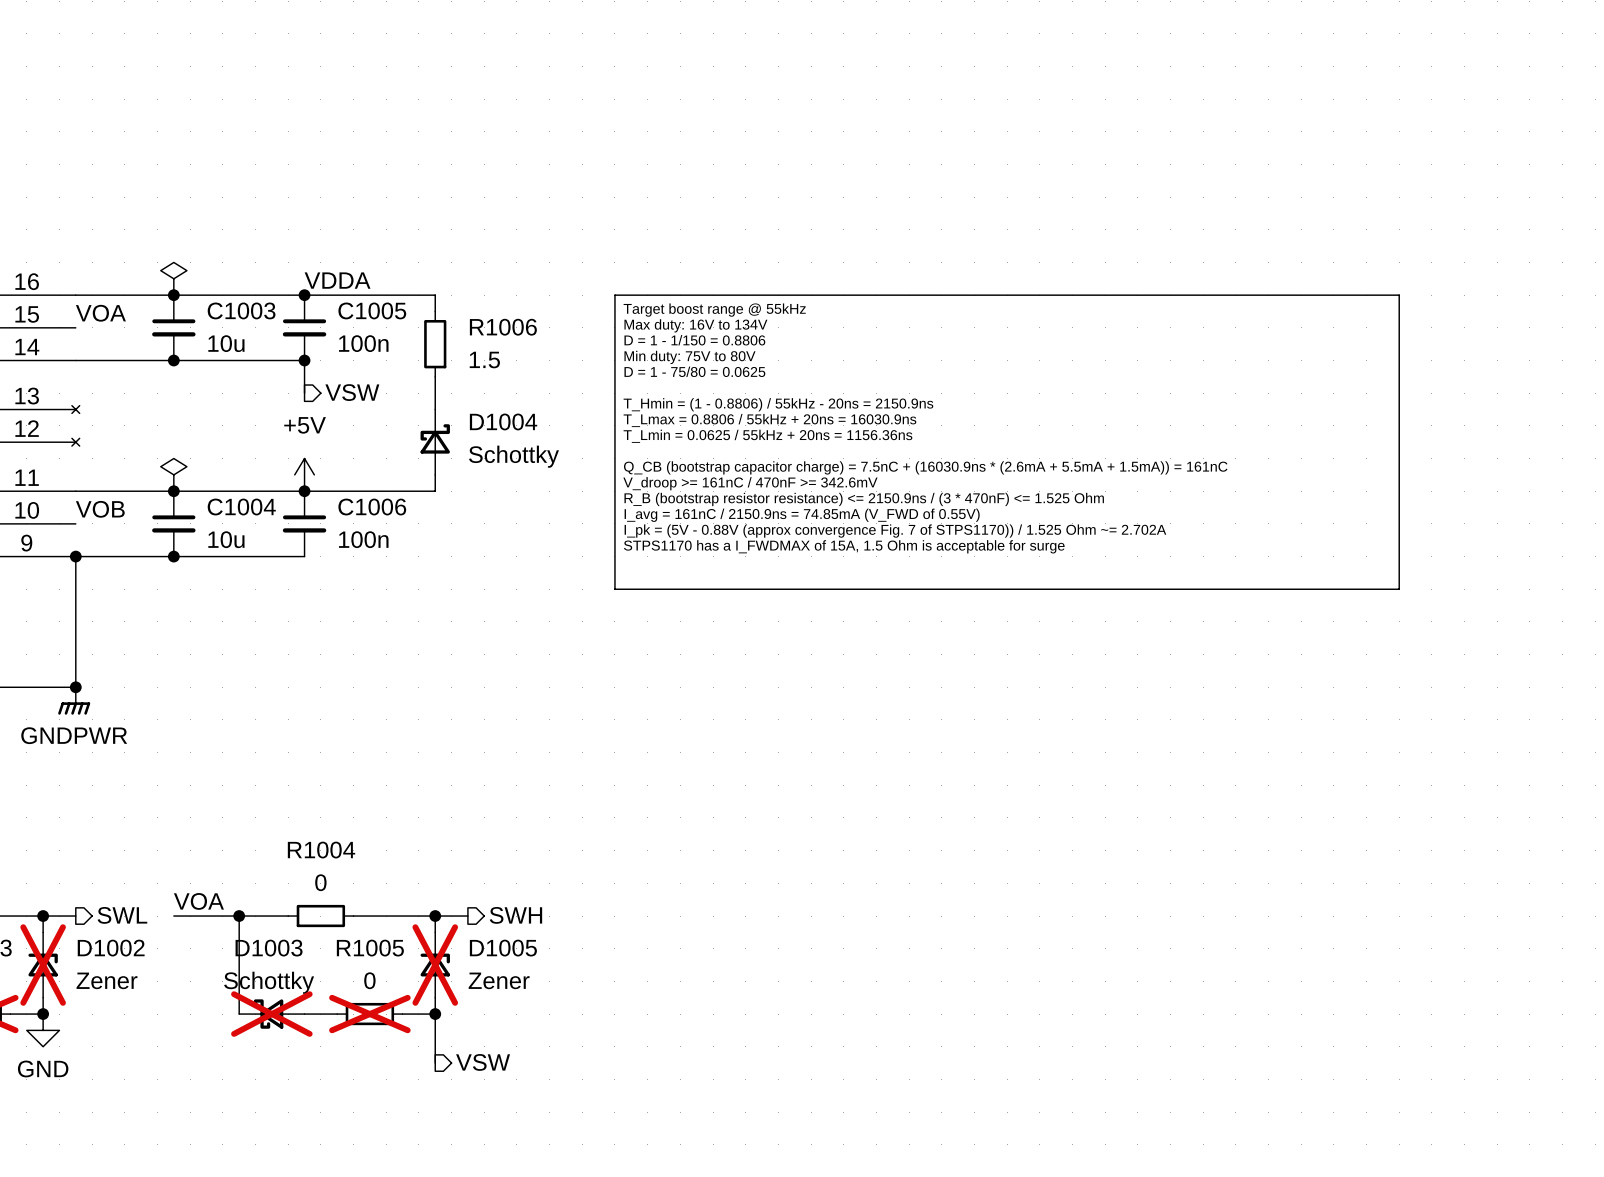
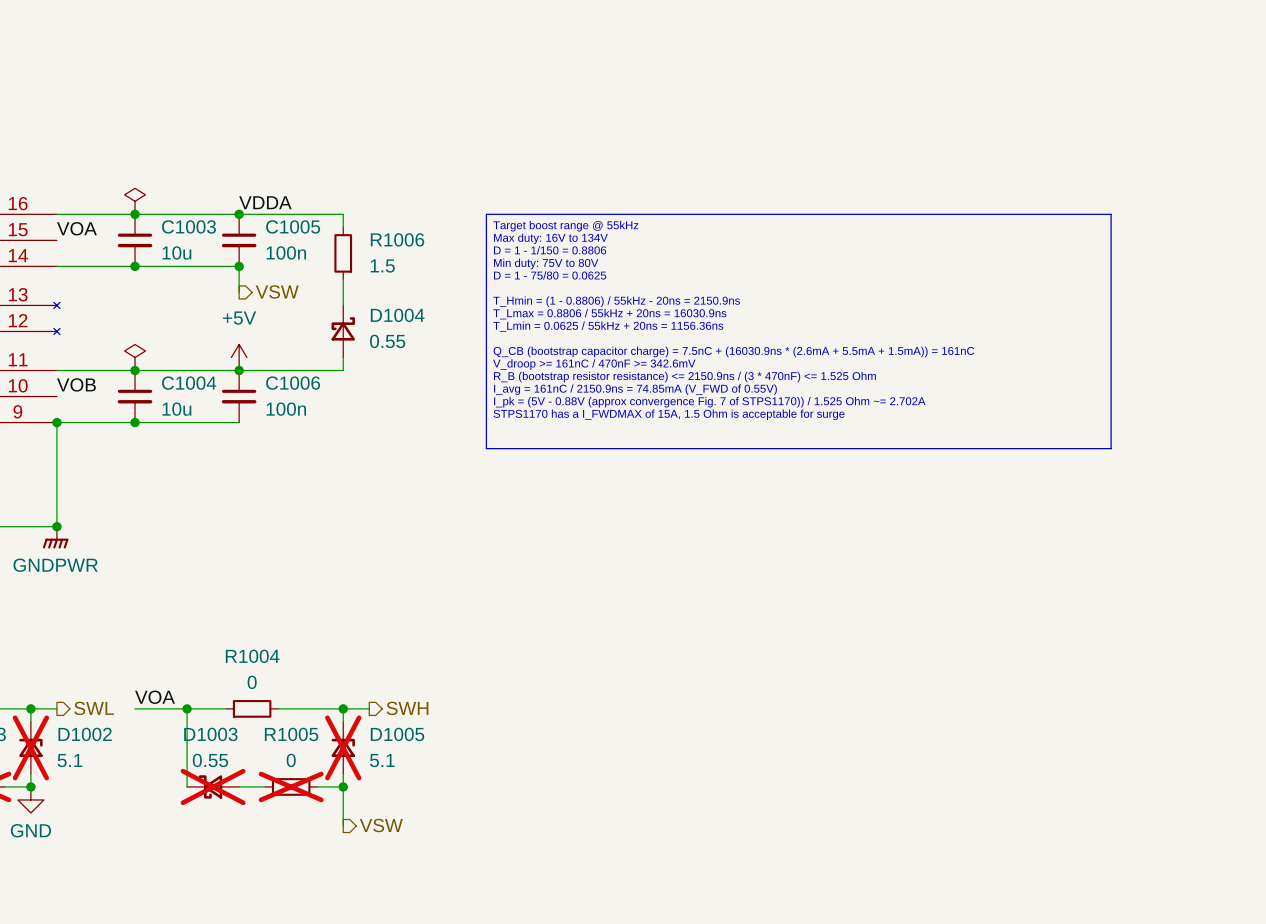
D1004 value: Schottky (513, 456) -> 0.55 (387, 341)
D1002 value: Zener (107, 980) -> 5.1 (70, 760)
D1005 value: Zener (499, 980) -> 5.1 (382, 760)
D1003 value: Schottky (269, 982) -> 0.55 (210, 760)

